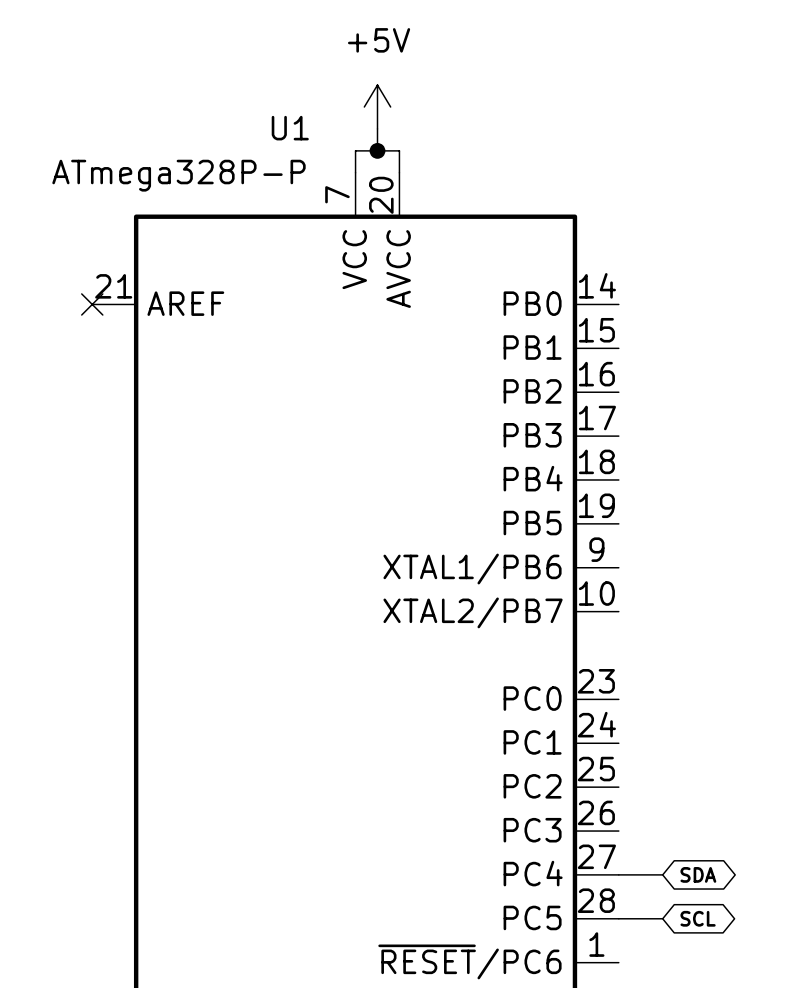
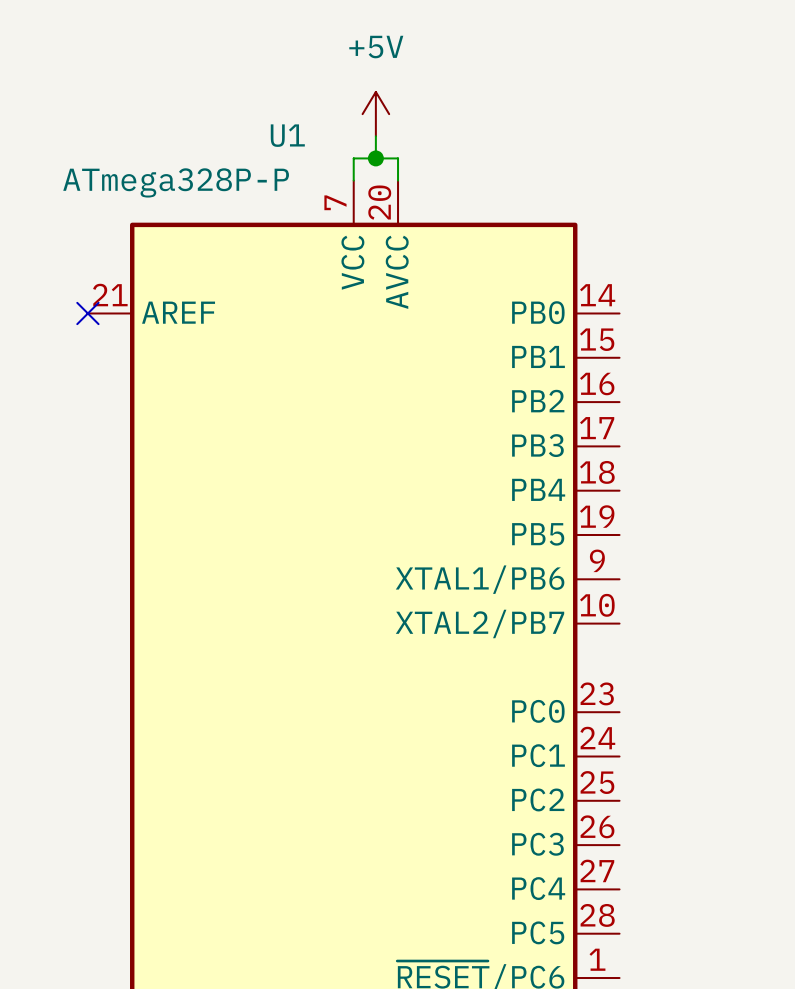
wire: (618, 874) (662, 874) -> none
global label: SDA (698, 874) -> none
wire: (618, 918) (662, 918) -> none
global label: SCL (698, 918) -> none

